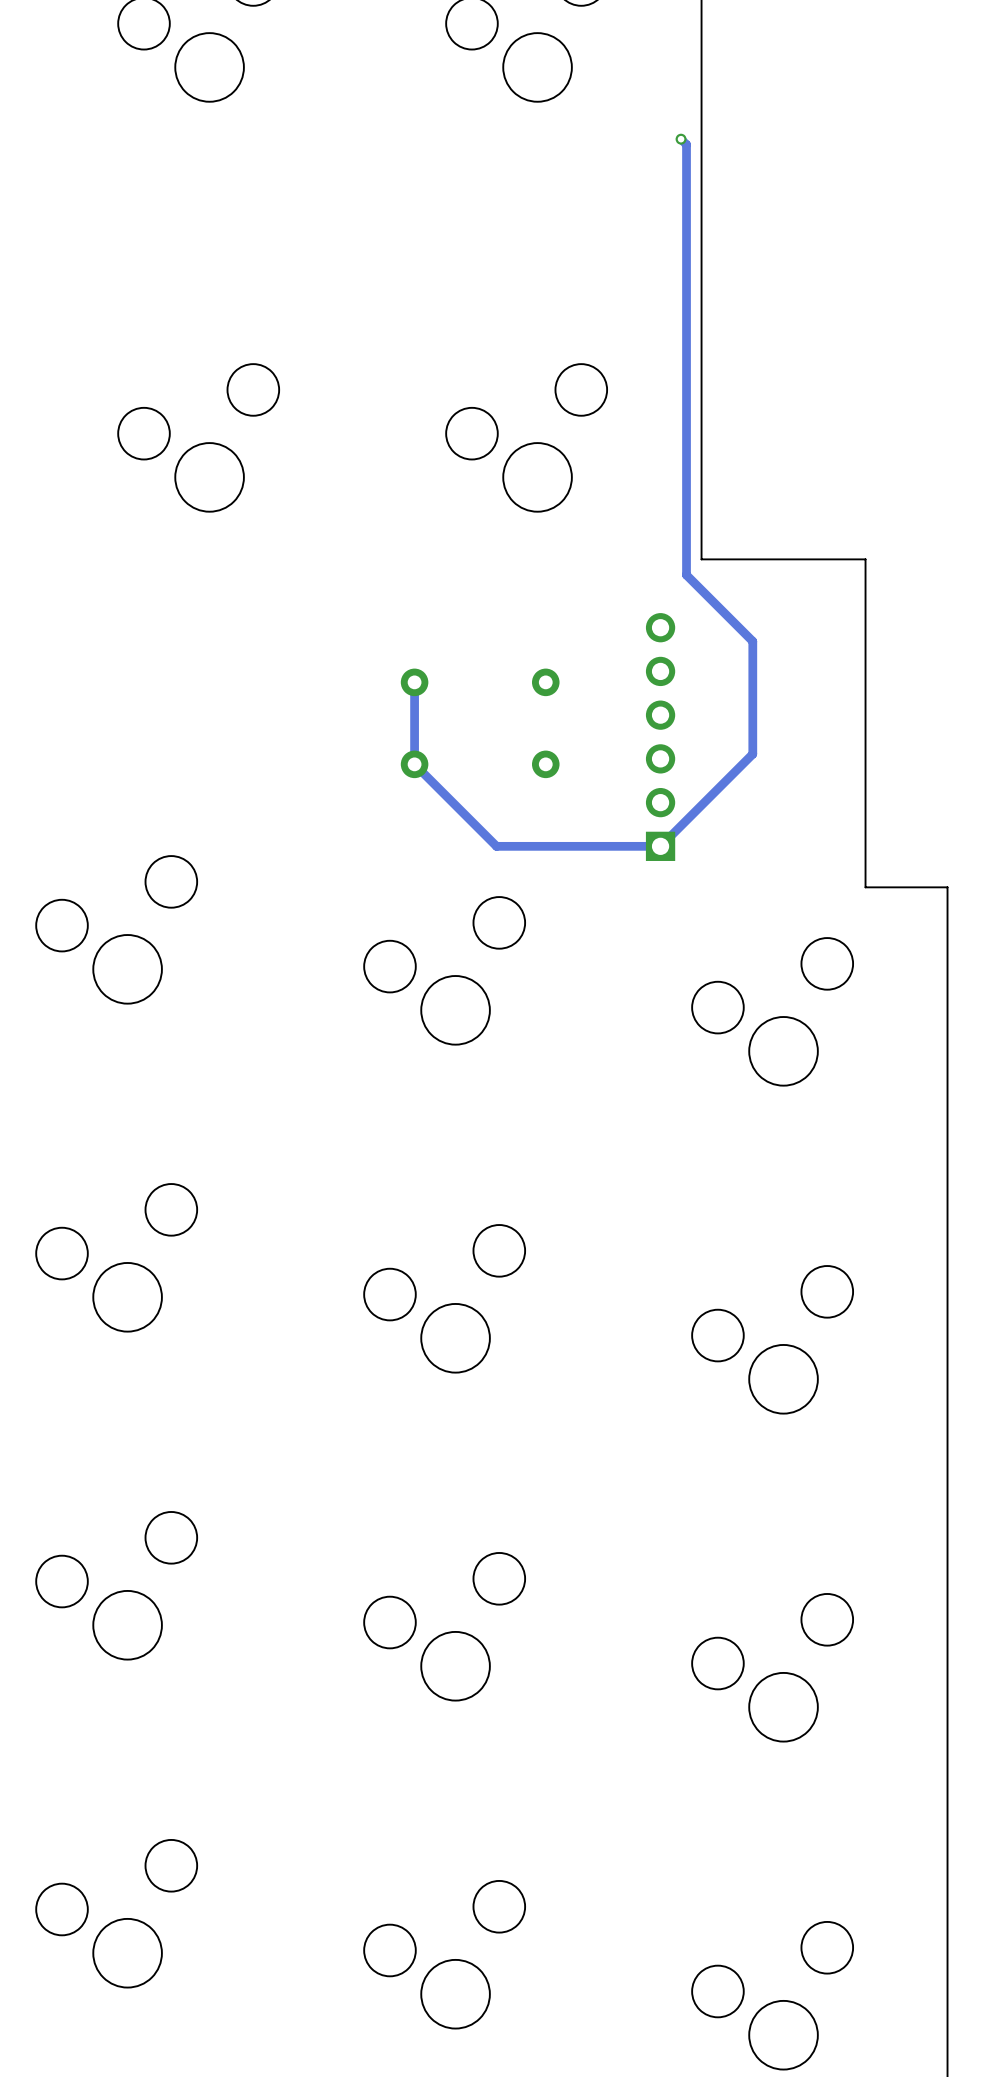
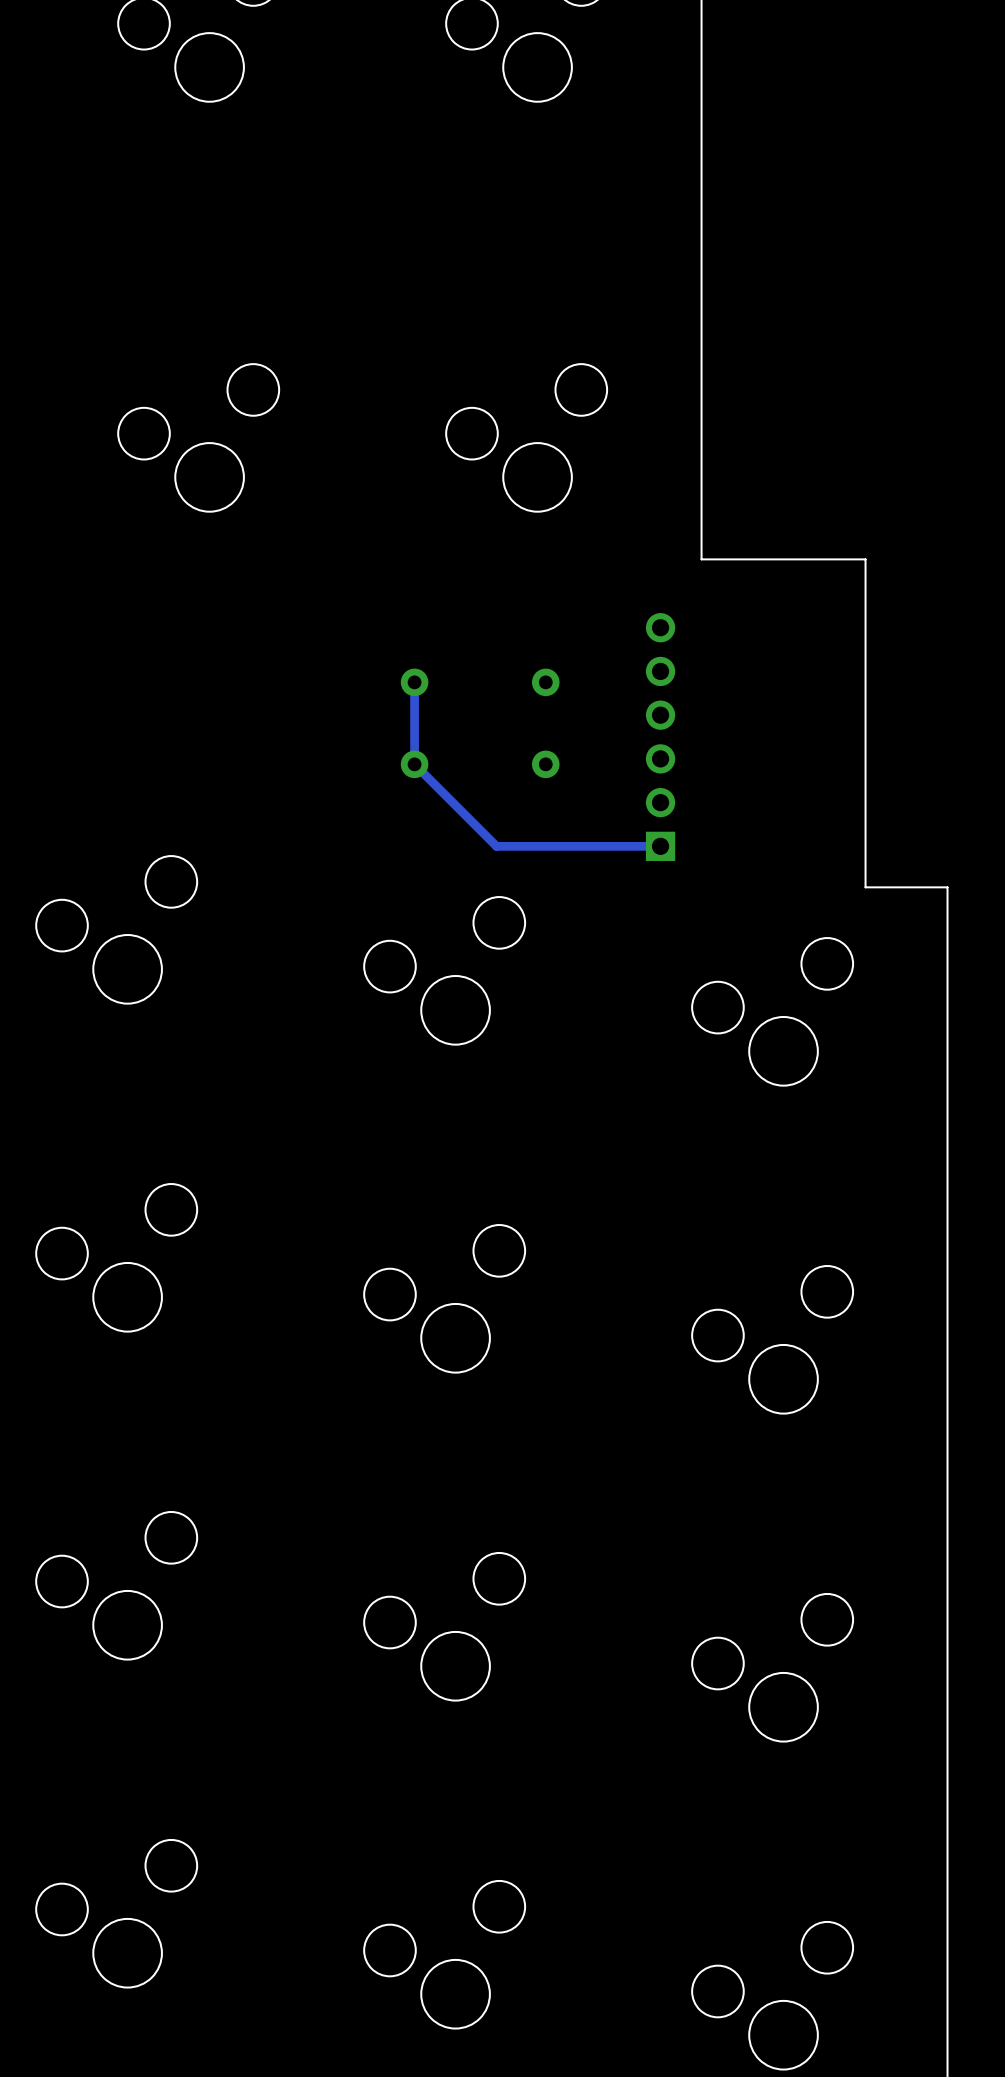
track: (681, 139) (686, 144) (686, 575) (752, 641) (752, 754) (660, 846) -> none
via: (681, 139) -> none

